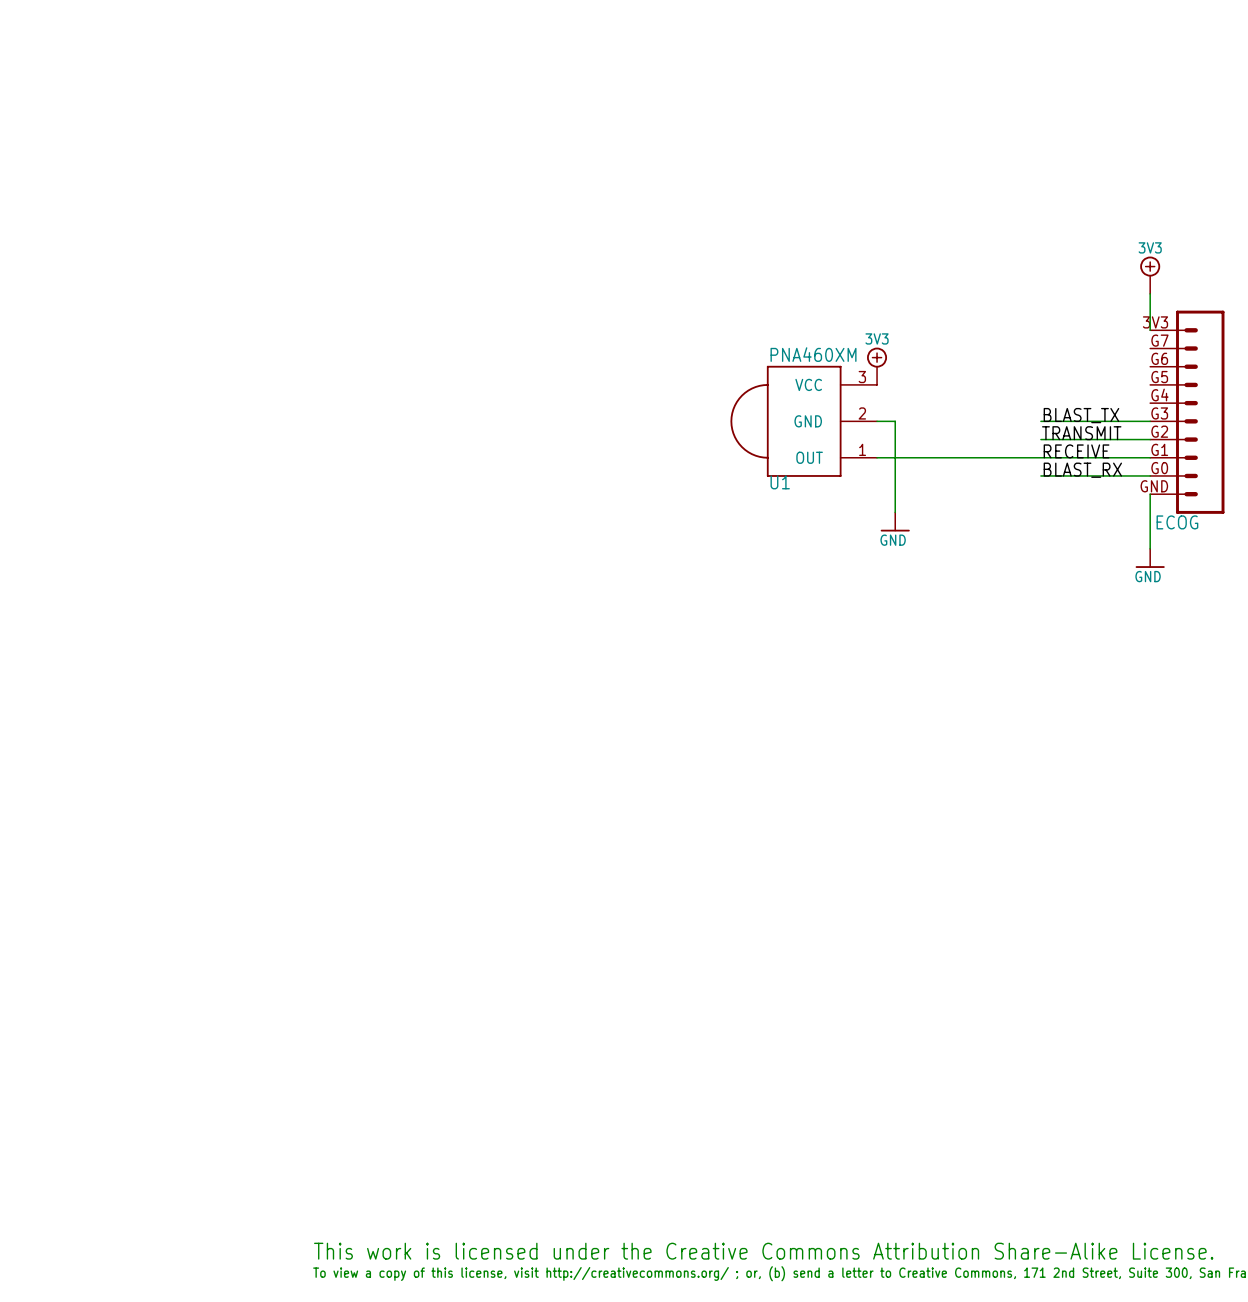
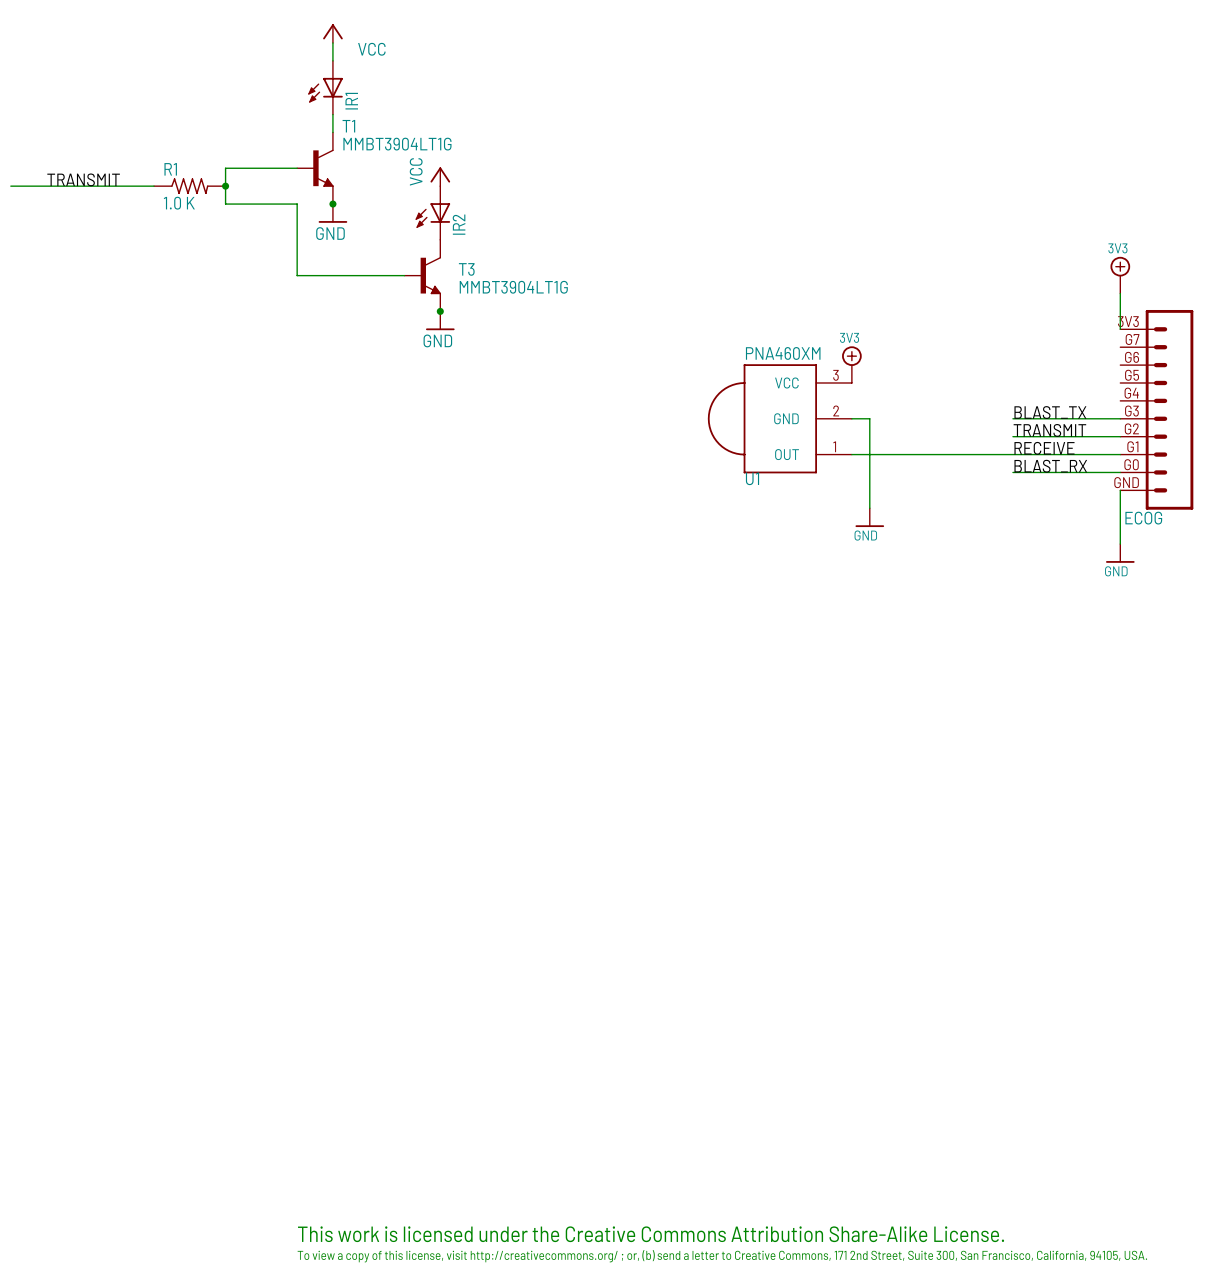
power symbol: none -> VCC (332, 33)
wire: none -> (332, 42) (332, 60)
IR1: none -> (325, 87)
wire: none -> (332, 114) (332, 132)
wire: none -> (297, 168) (225, 168) (225, 204) (297, 204) (297, 275) (404, 275)
T1: none -> MMBT3904LT1G (315, 168)
power symbol: none -> VCC (440, 176)
label: none -> TRANSMIT (83, 179)
wire: none -> (10, 186) (154, 186)
R1: none -> 1.0 K (189, 186)
junction: none -> (225, 186)
junction: none -> (332, 204)
IR2: none -> (432, 212)
power symbol: none -> GND (332, 213)
T3: none -> MMBT3904LT1G (422, 275)
junction: none -> (440, 311)
power symbol: none -> GND (440, 320)

